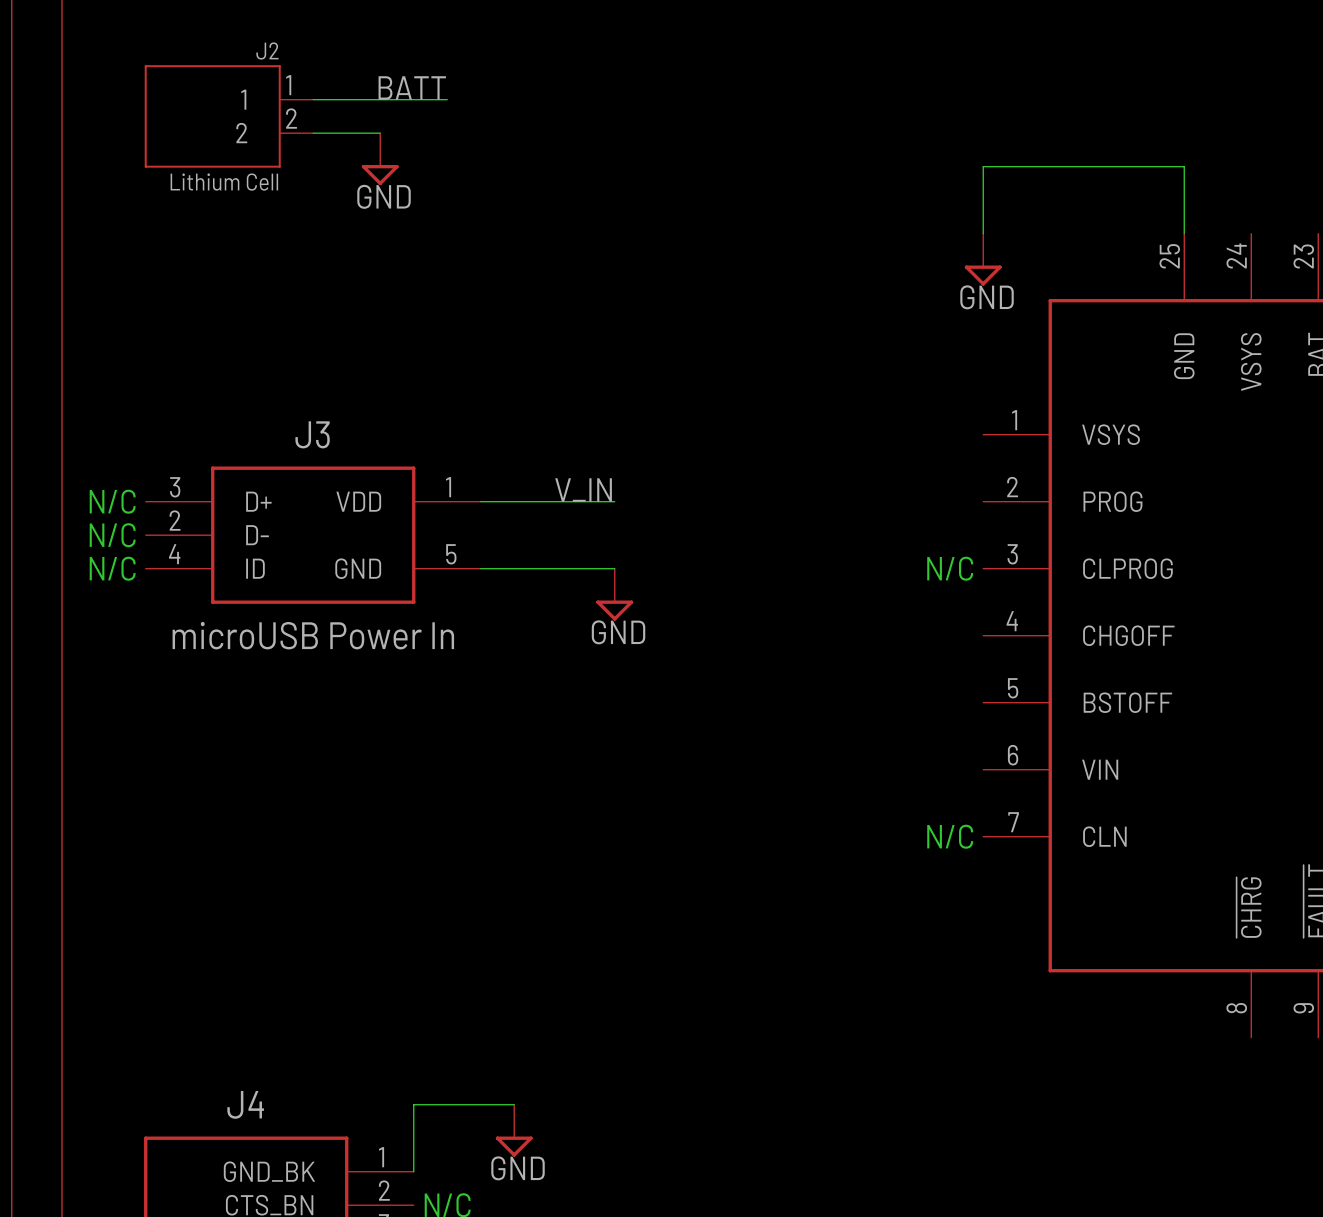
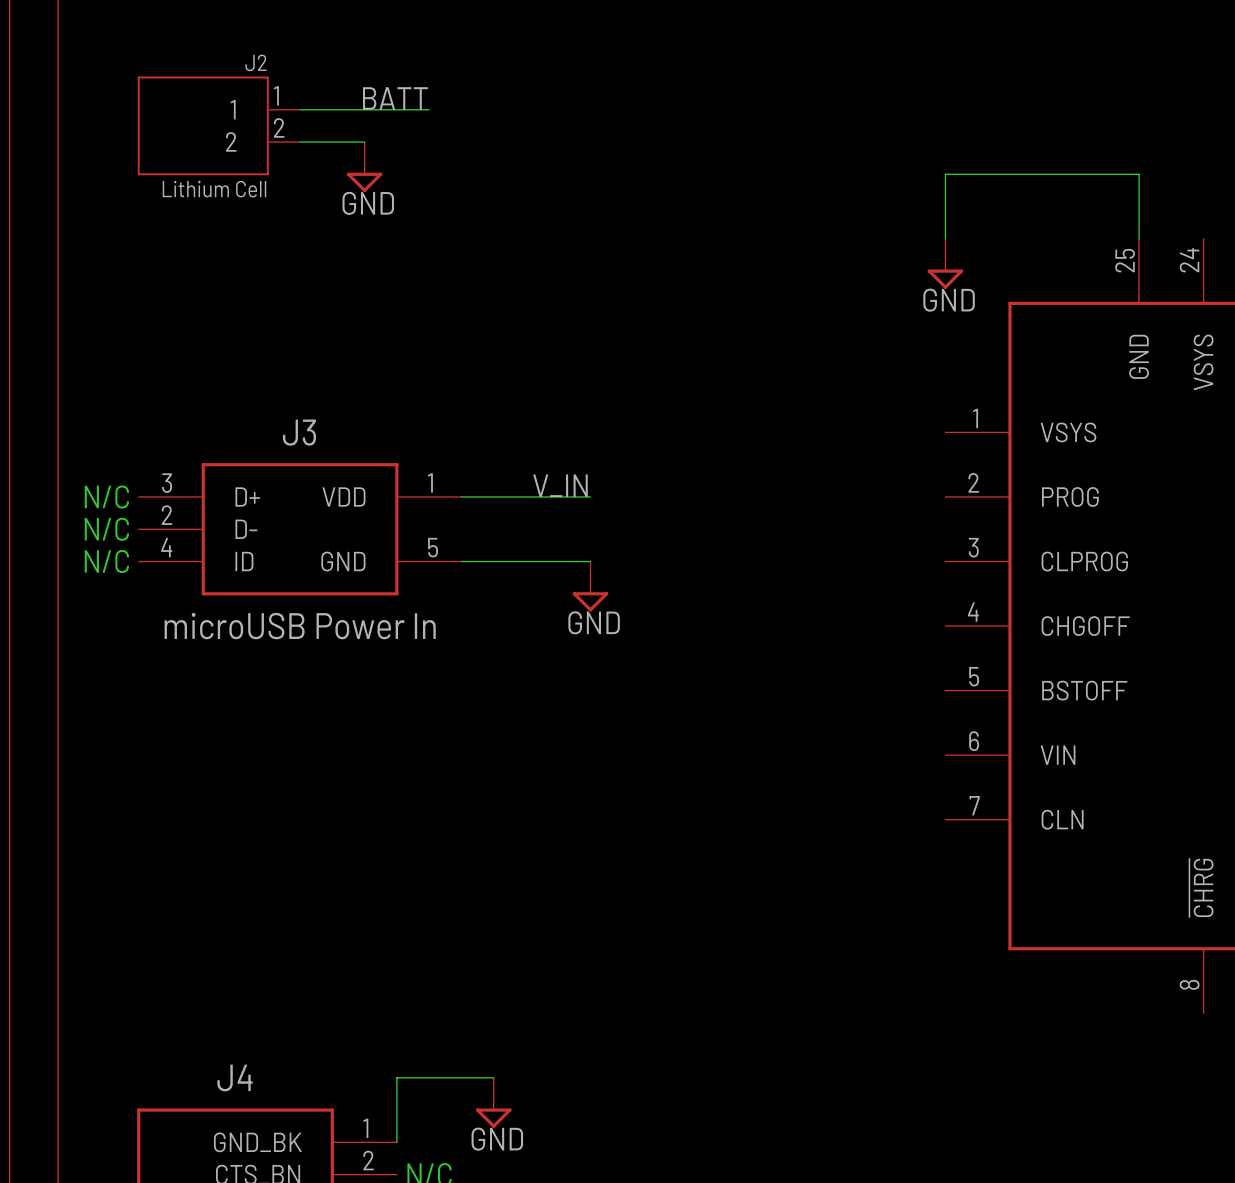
text: N/C (950, 568) -> none
text: N/C (950, 836) -> none

